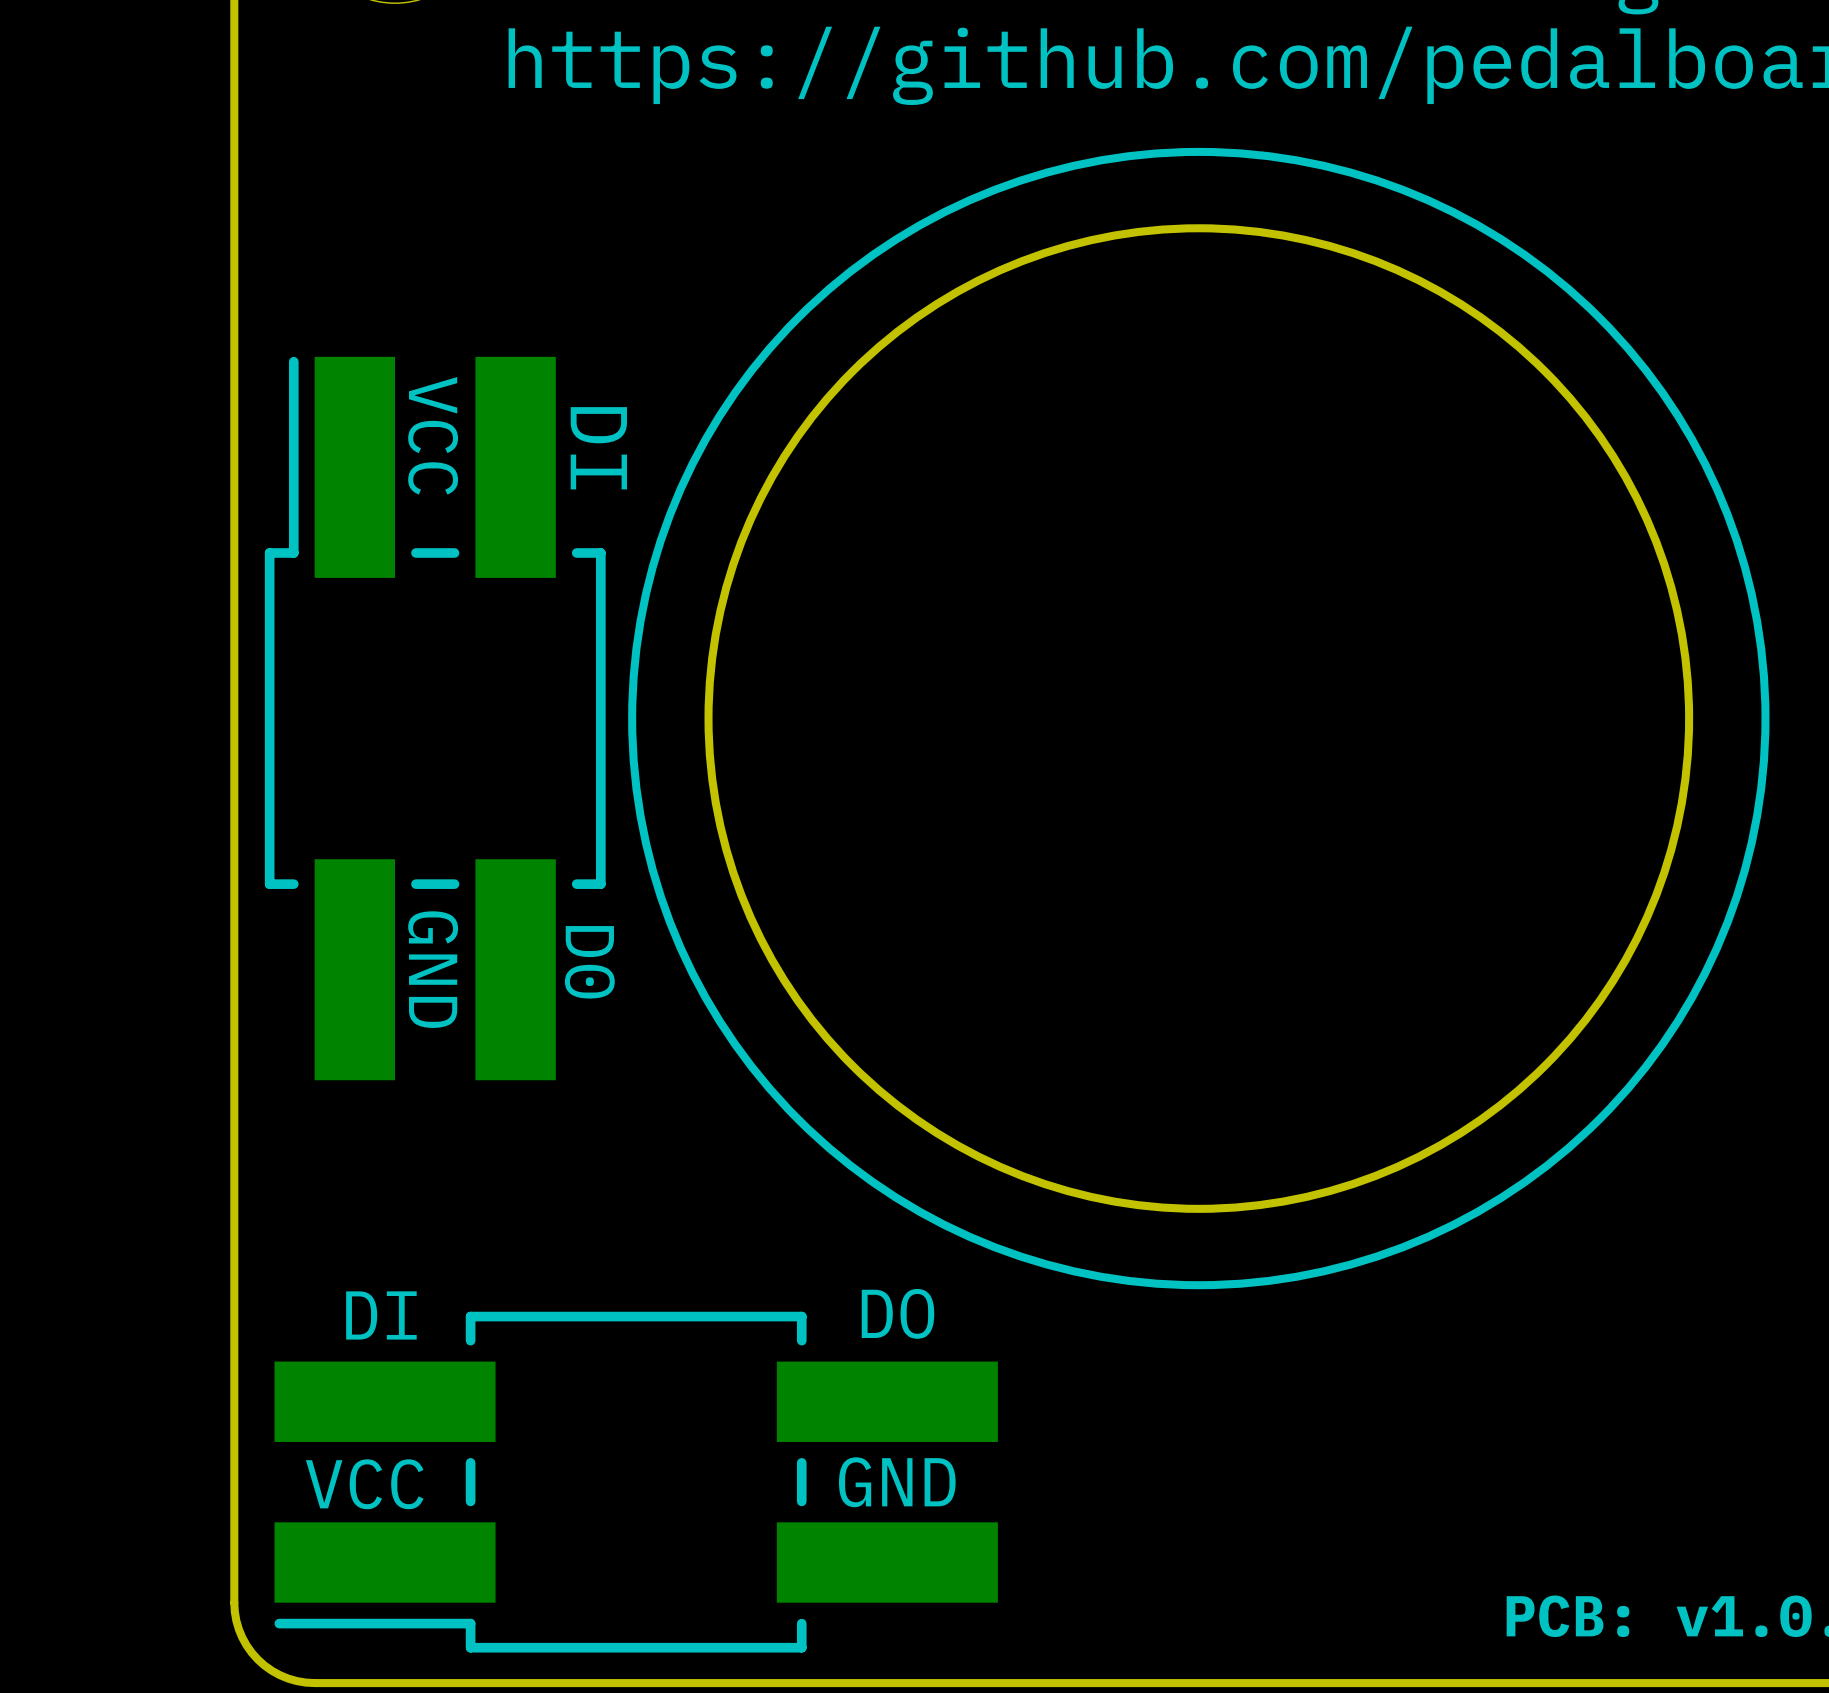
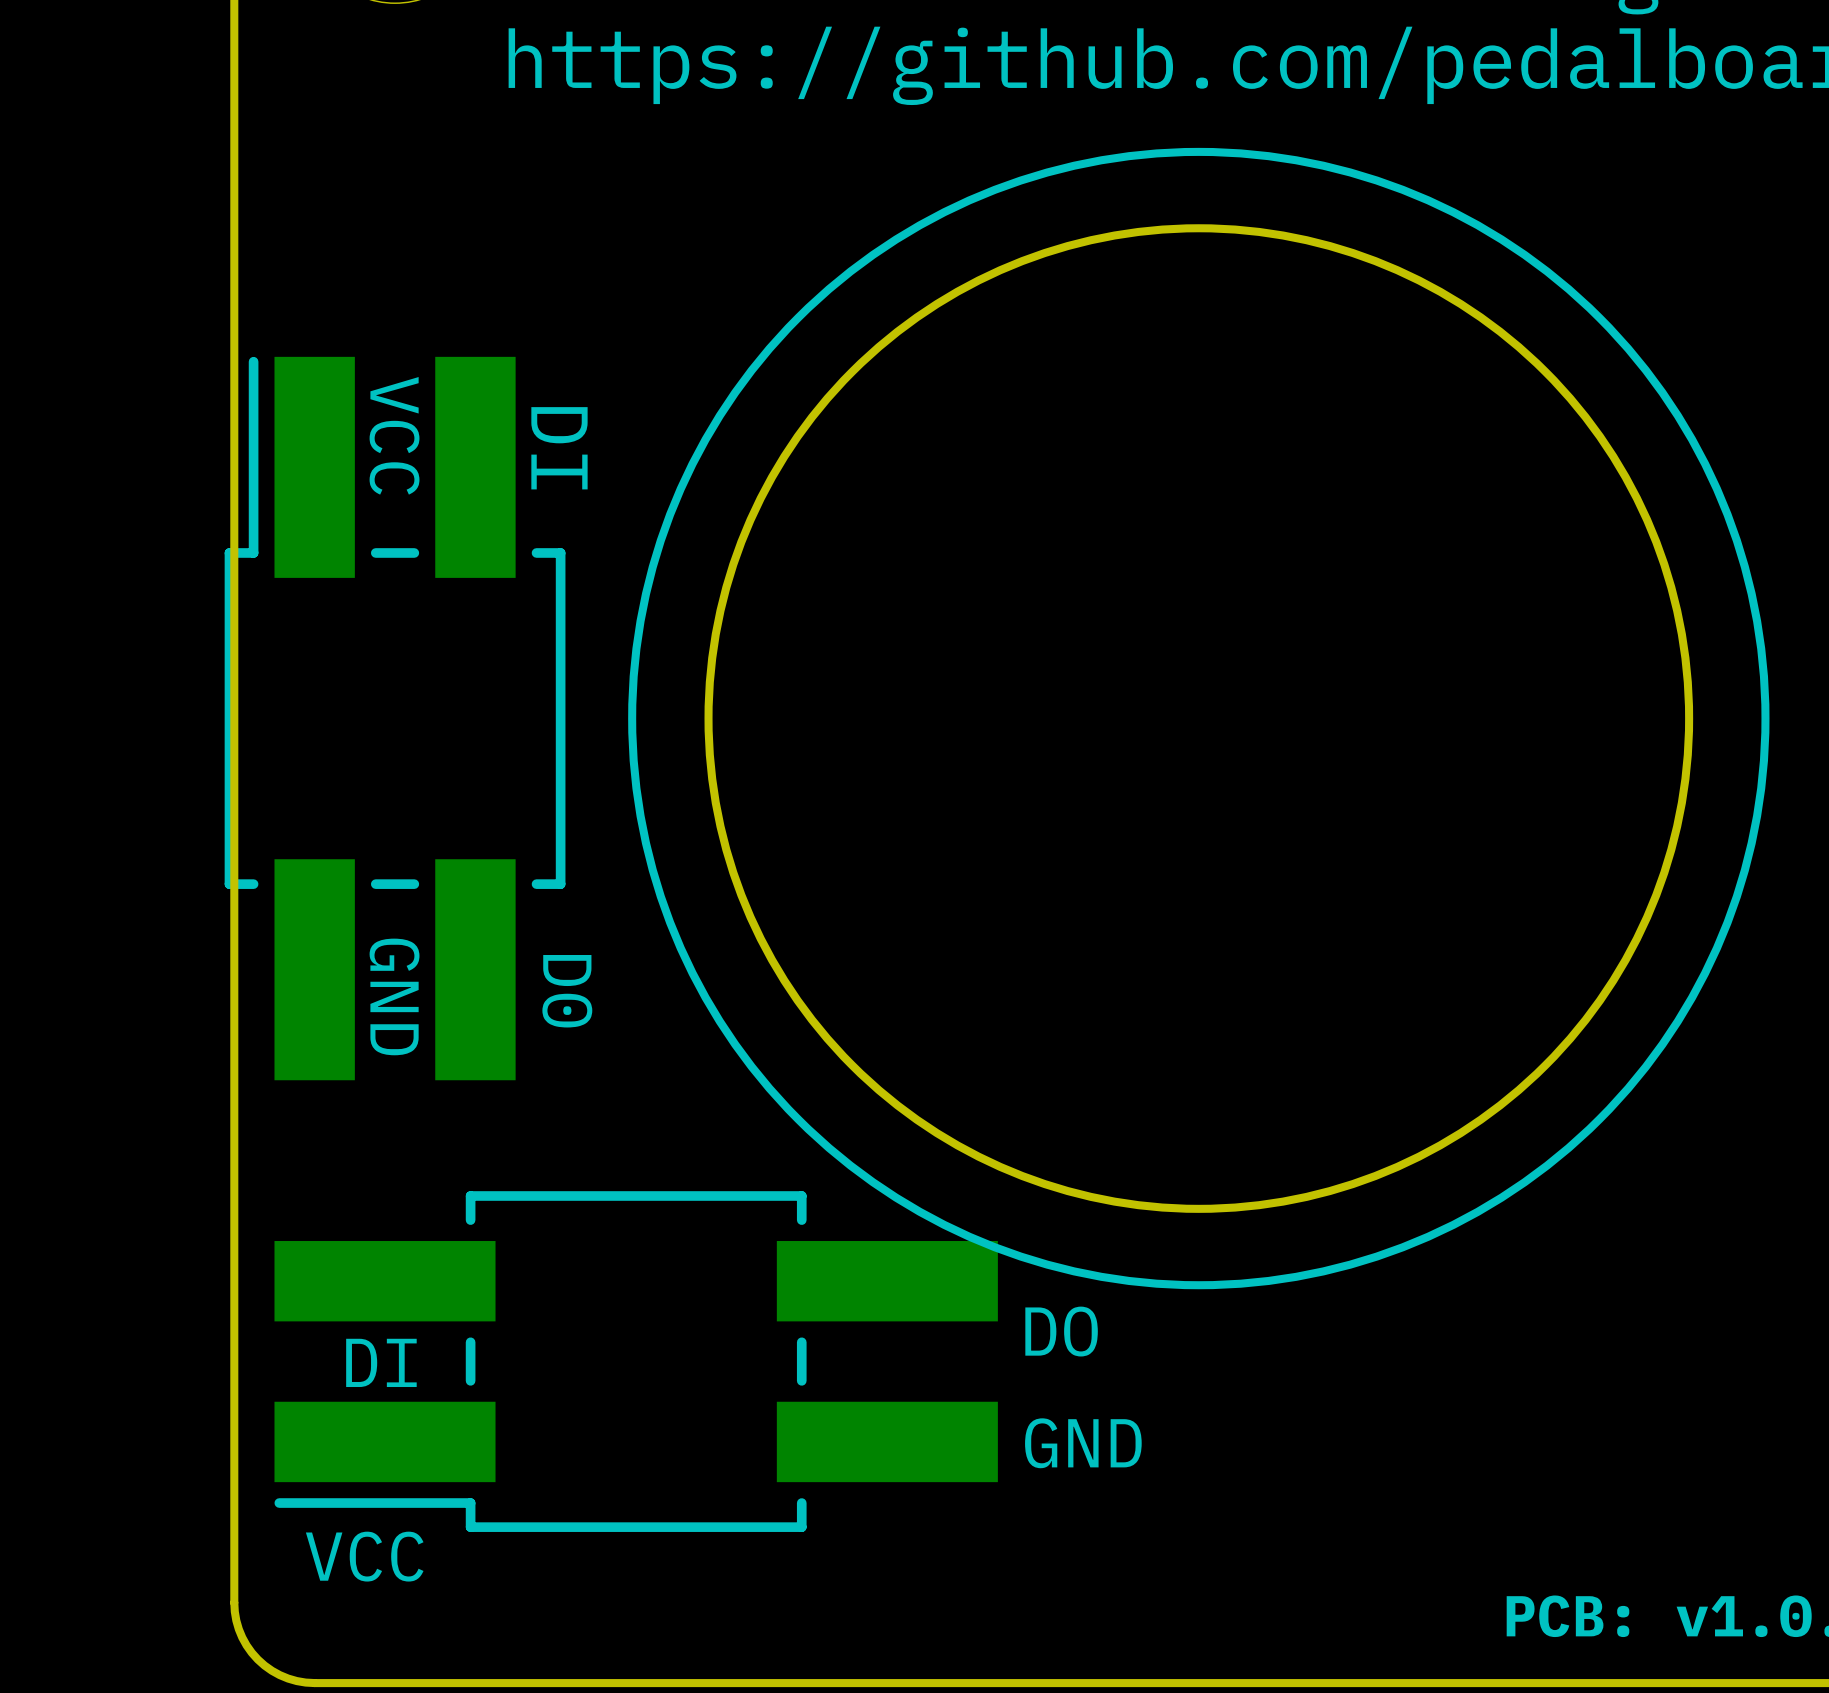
text position: VCC (433, 435) -> VCC (394, 435)
text position: DI (598, 448) -> DI (559, 448)
part position: (435, 718) -> (395, 718)
text position: D0 (589, 962) -> D0 (567, 991)
text position: GND (433, 969) -> GND (394, 996)
text position: DO (898, 1313) -> DO (1061, 1331)
text position: DI (381, 1315) -> DI (381, 1362)
part position: (636, 1482) -> (636, 1361)
text position: GND (897, 1482) -> GND (1083, 1443)
text position: VCC (364, 1484) -> VCC (364, 1556)

